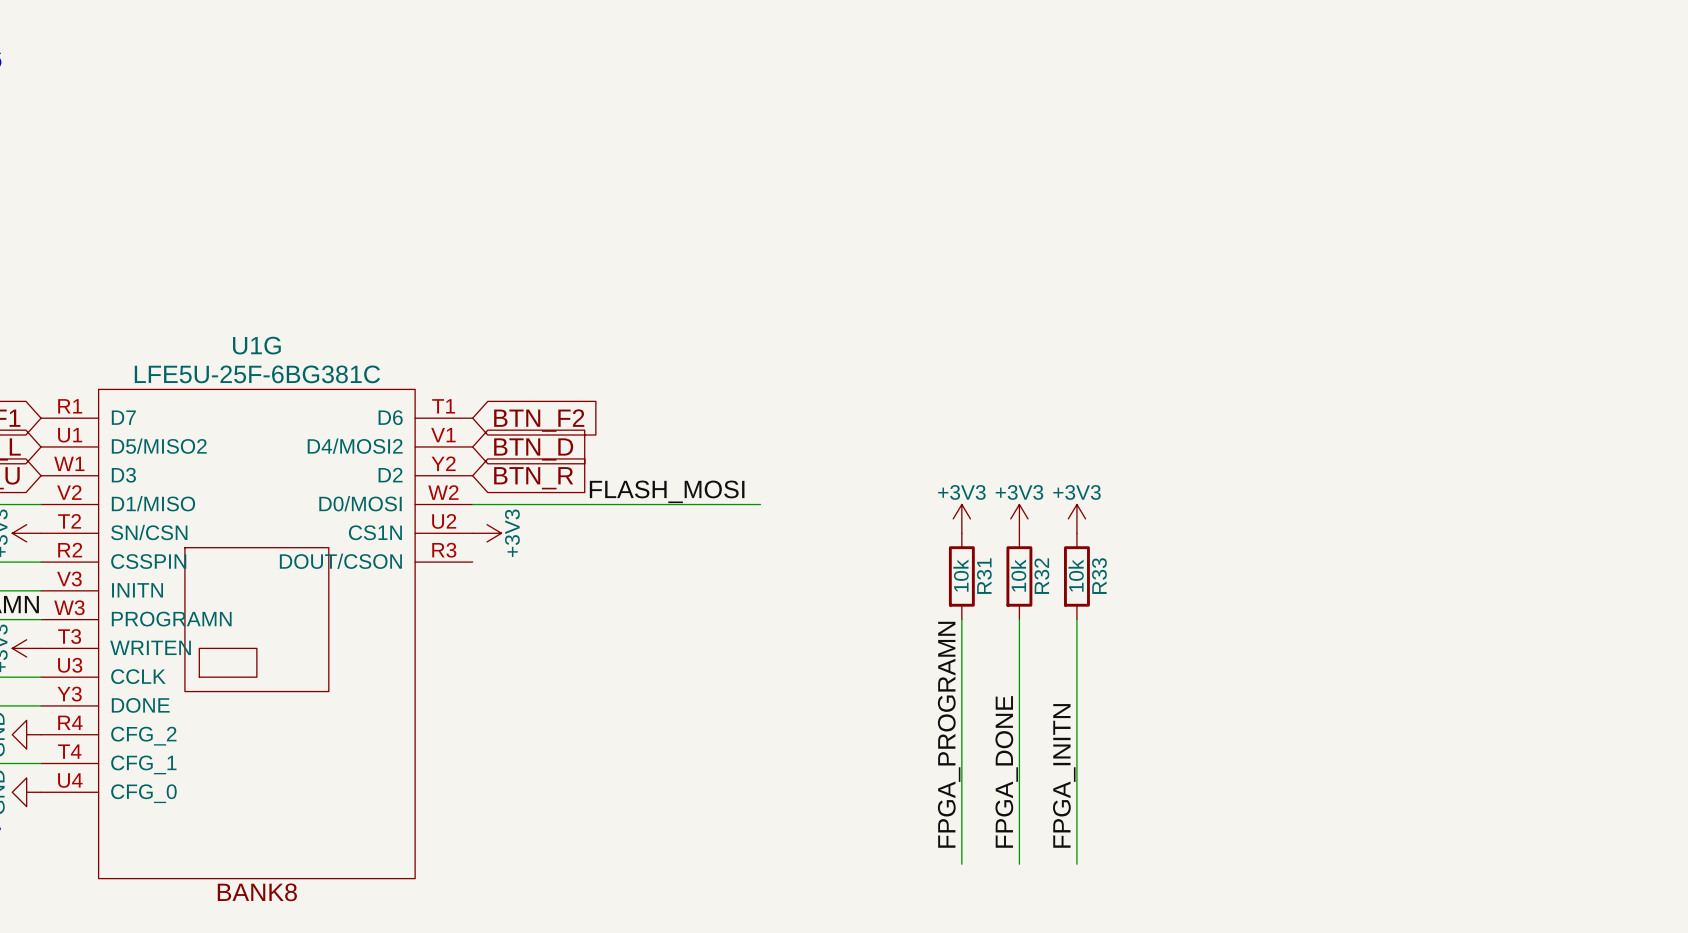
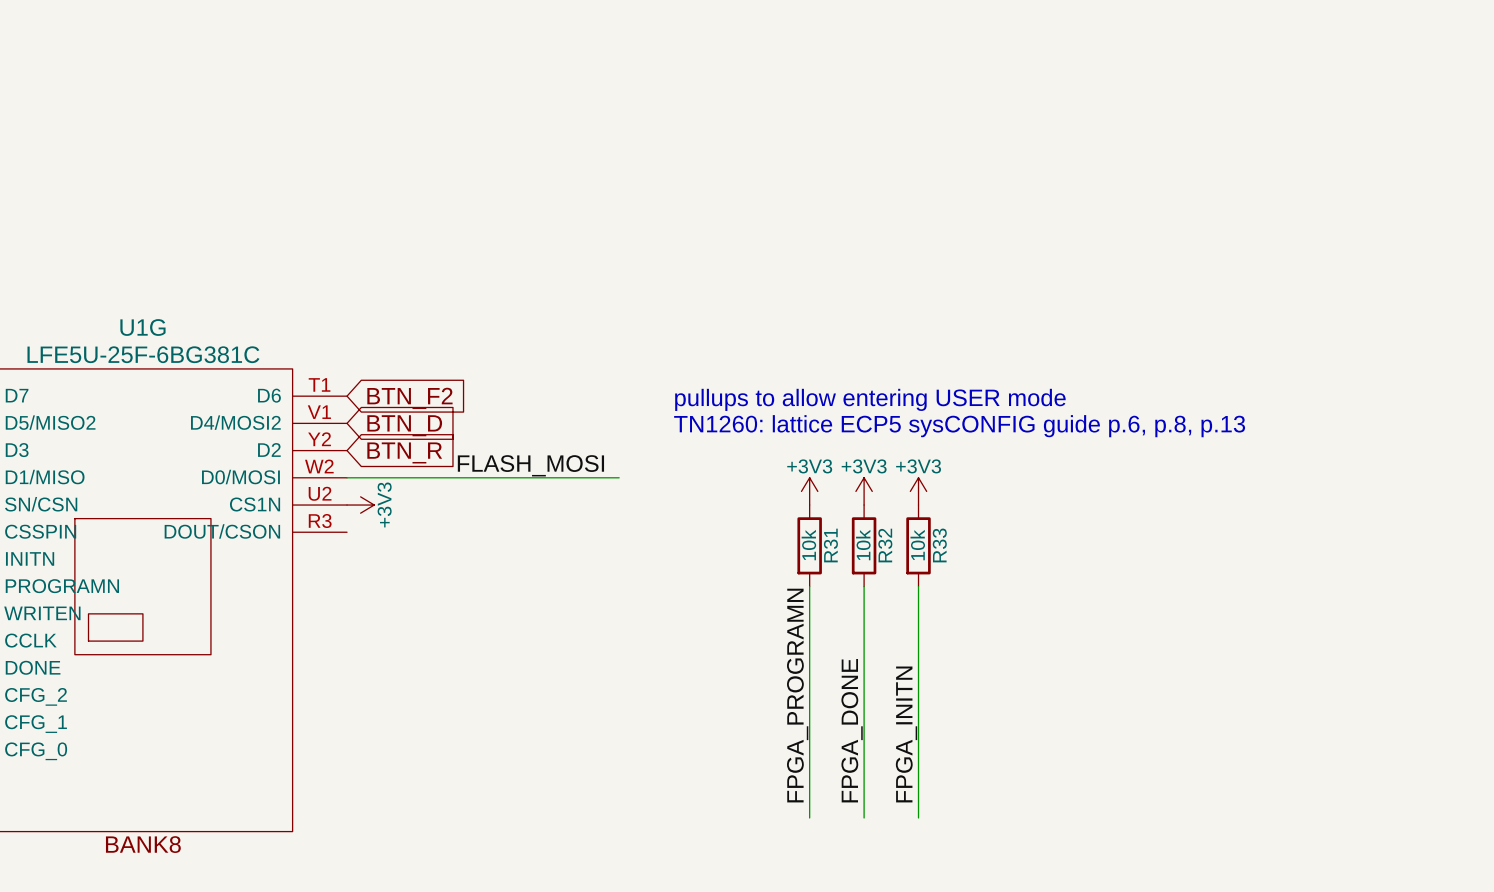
text: none -> pullups to allow entering USER mode (870, 399)
text: none -> TN1260: lattice ECP5 sysCONFIG guide p.6, p.8, p.13 (959, 426)

